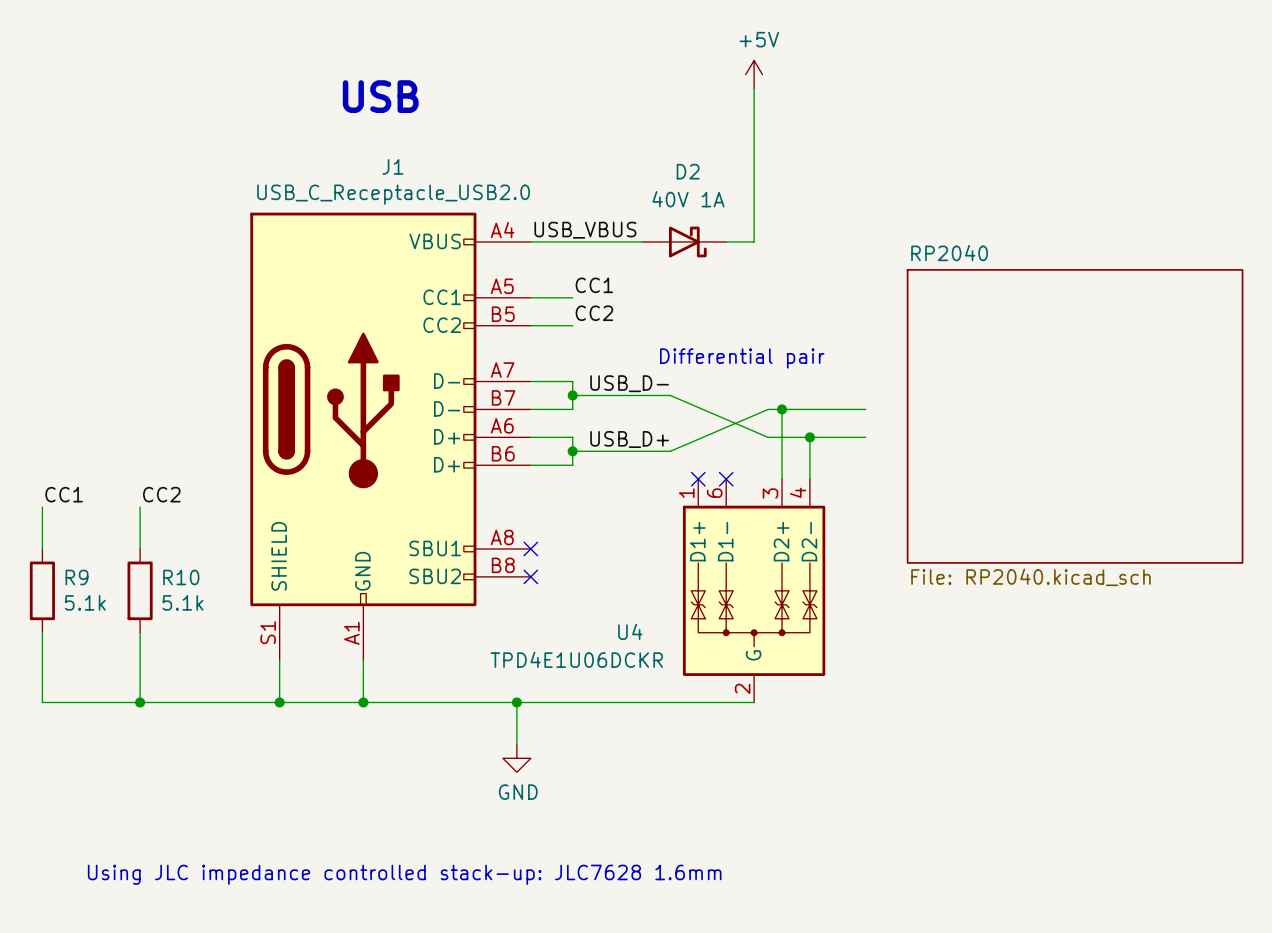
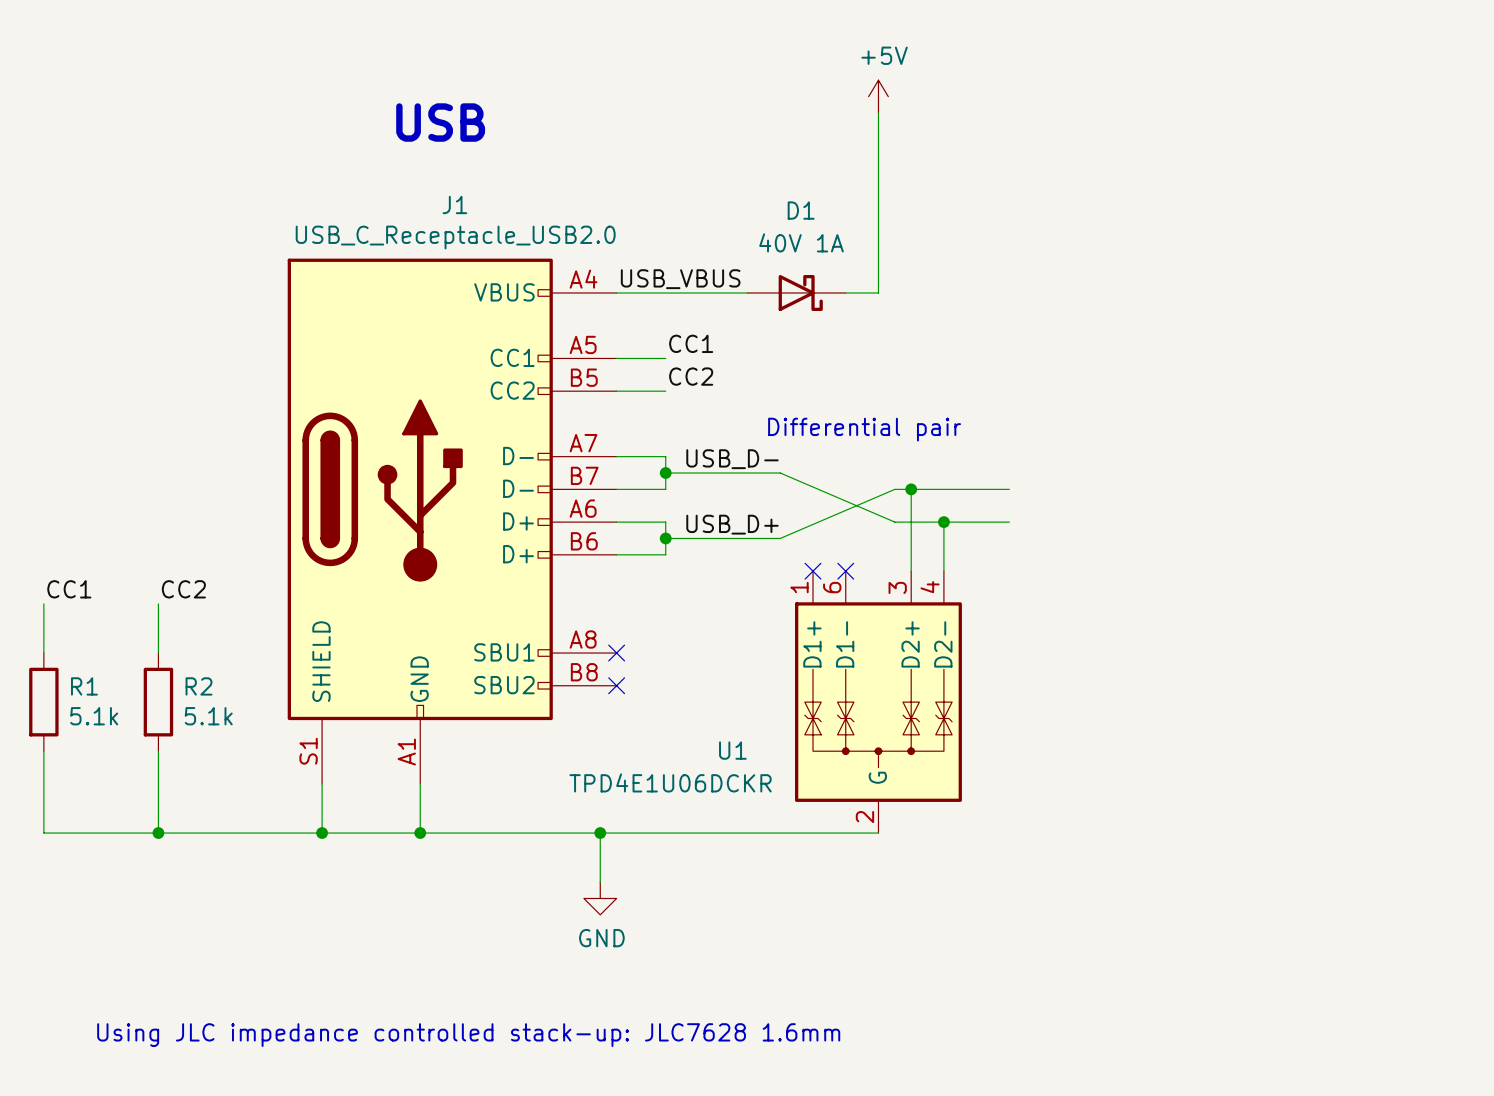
D2 name: D2 (688, 171) -> D1 (801, 210)
sheet RP2040: File: RP2040.kicad_sch (1075, 416) -> none
R9 name: R9 (77, 577) -> R1 (84, 686)
R10 name: R10 (181, 577) -> R2 (198, 686)
U4 name: U4 (630, 631) -> U1 (732, 750)

